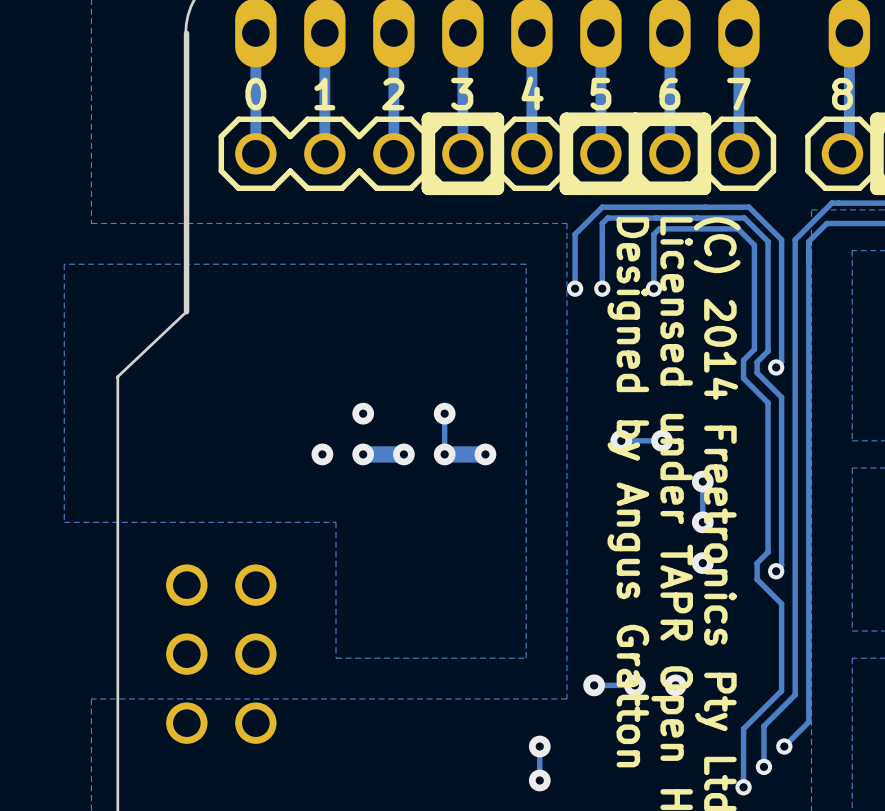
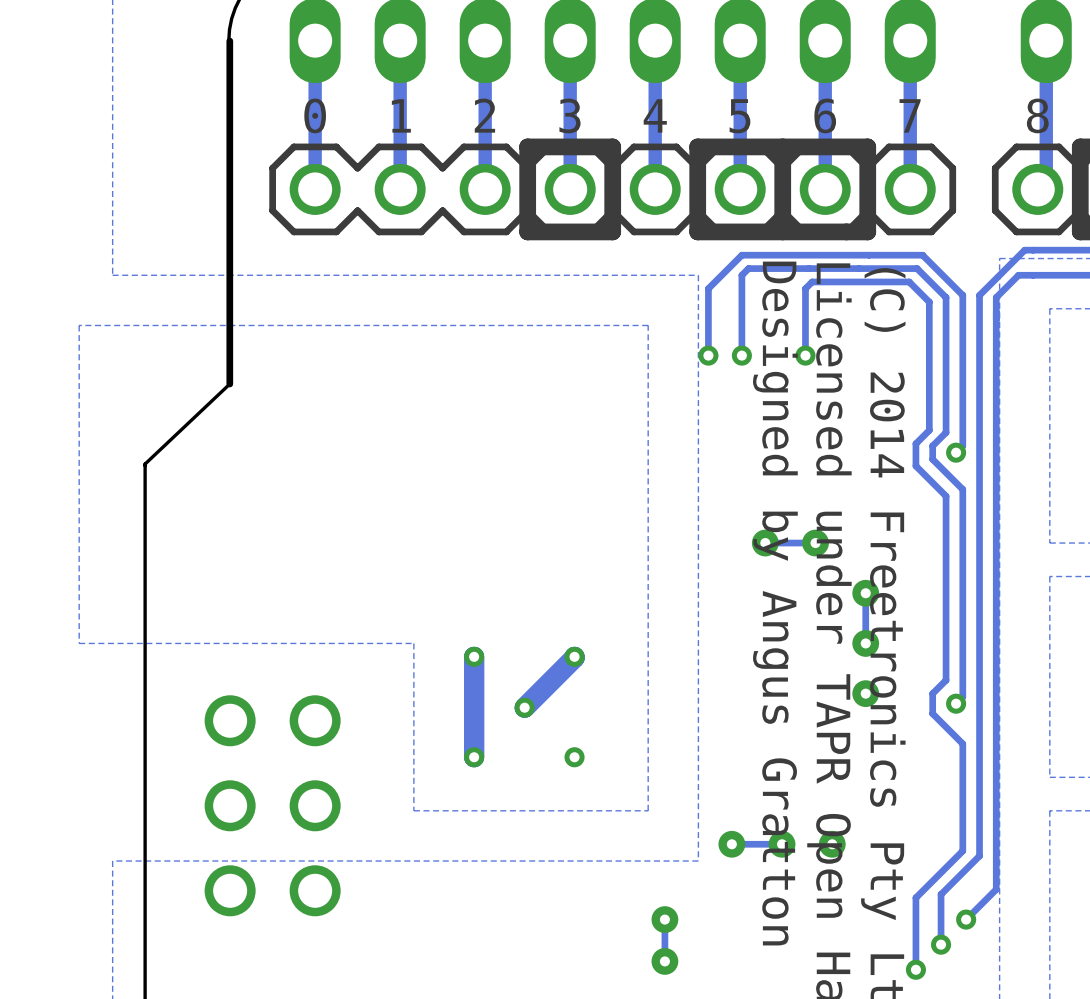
via: (363, 413) -> none
track: (444, 413) (444, 454) (485, 454) -> none
via: (444, 413) -> none
via: (322, 454) -> none
via: (363, 454) -> none
track: (403, 454) (363, 454) -> none
via: (403, 454) -> none
via: (444, 454) -> none
via: (485, 454) -> none
track: none -> (474, 656) (474, 757)
via: none -> (474, 656)
track: none -> (574, 656) (524, 707)
via: none -> (574, 656)
via: none -> (524, 707)
via: none -> (474, 757)
via: none -> (574, 757)

